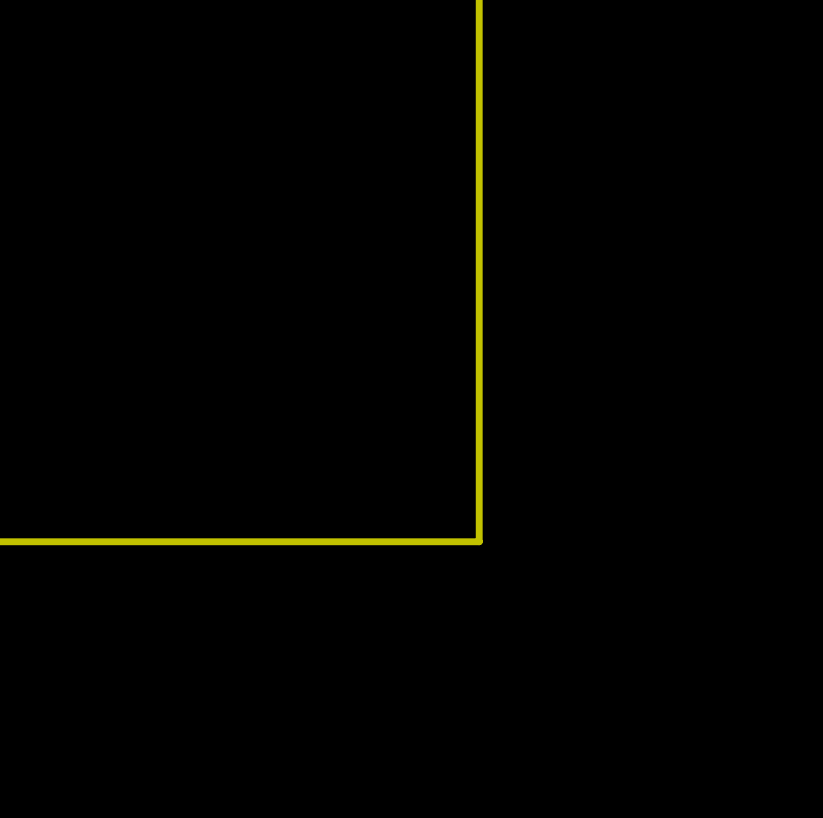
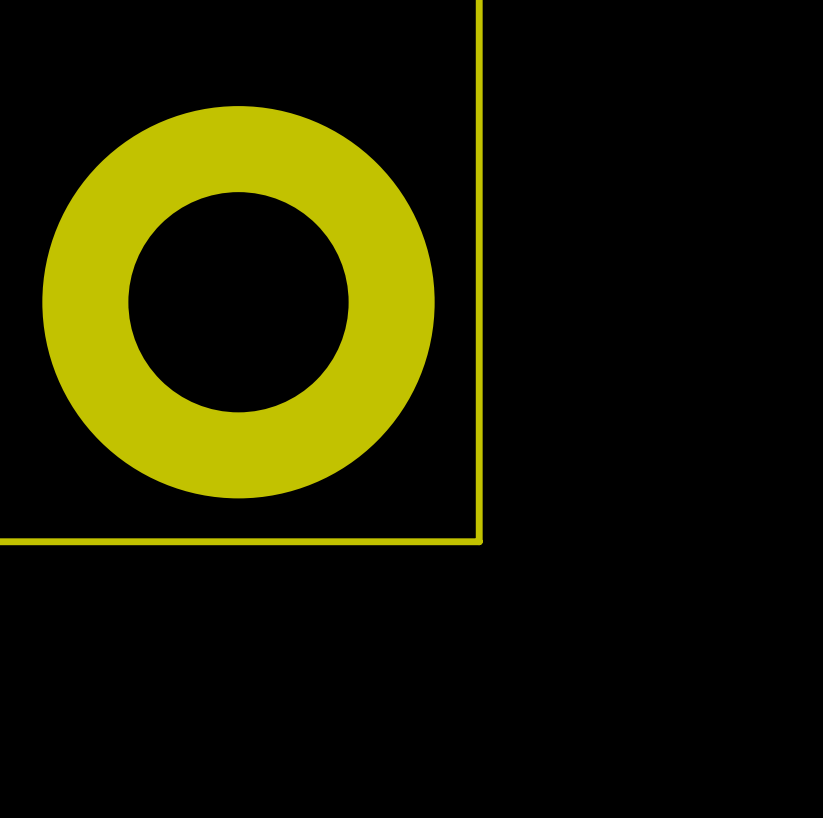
part: none -> (238, 302)

